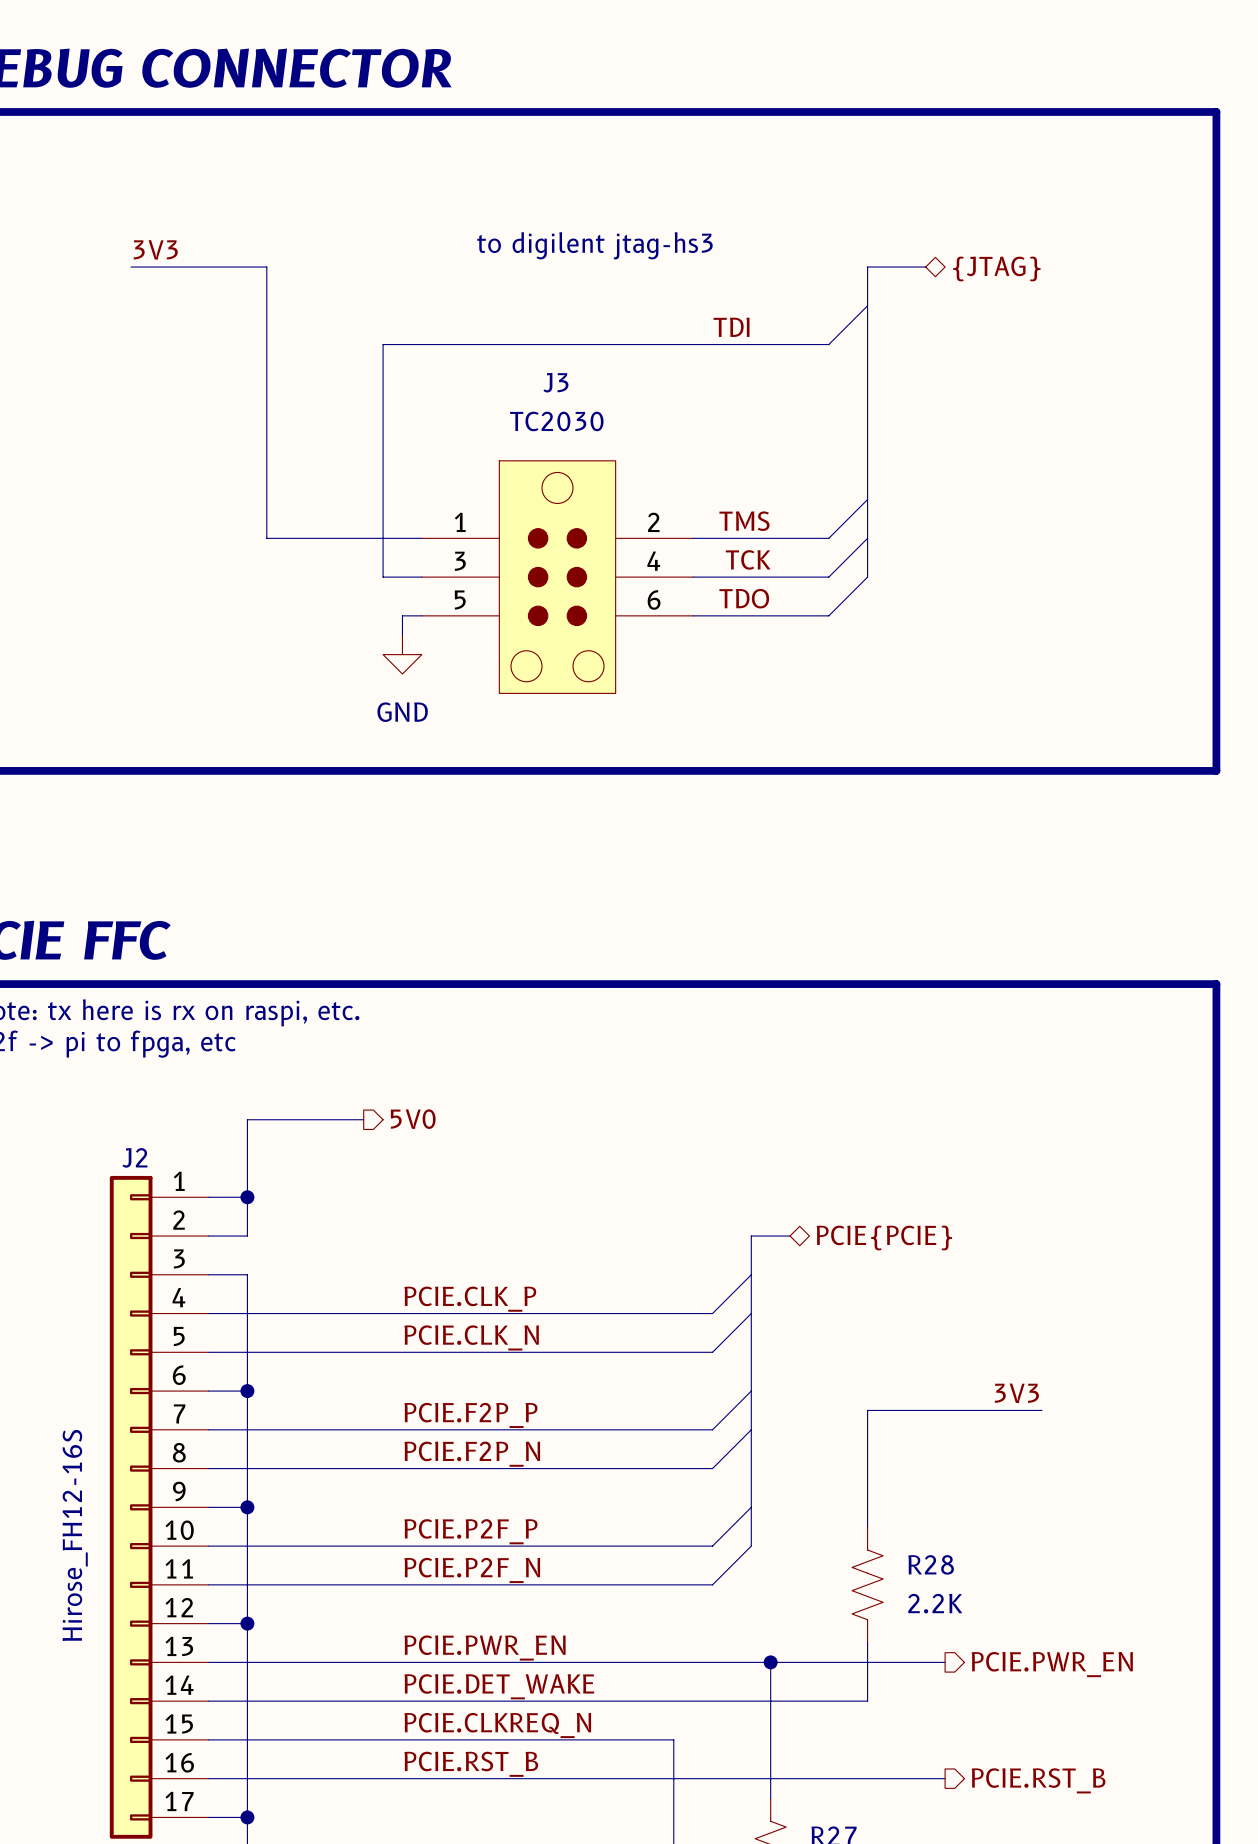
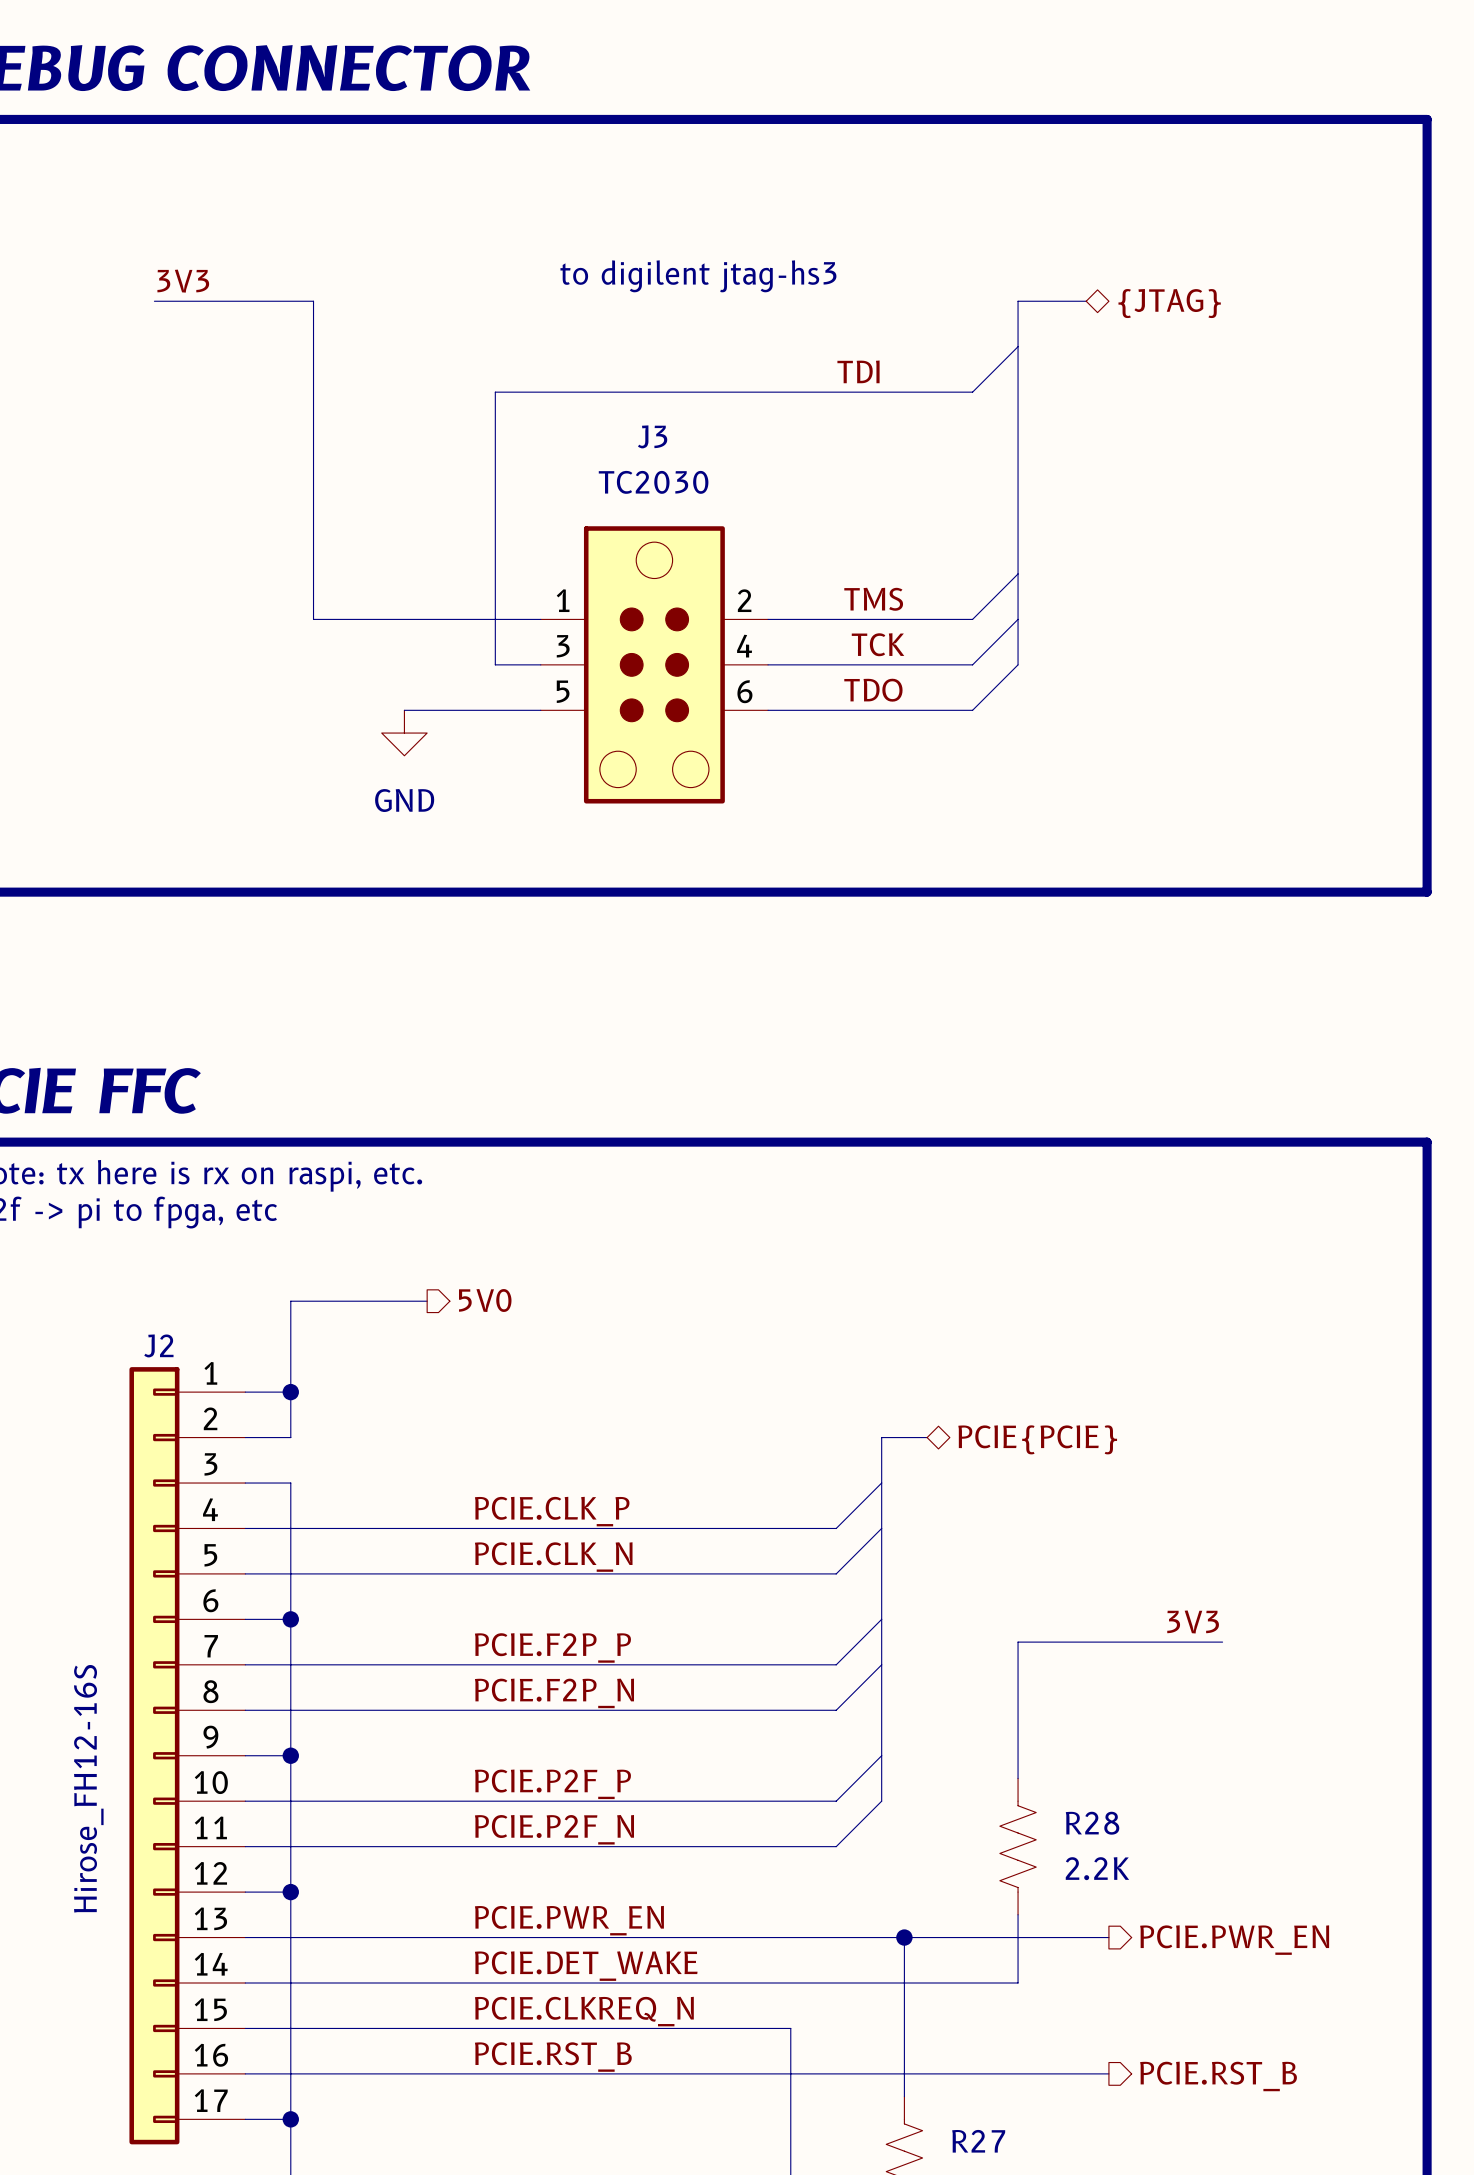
wire: (421, 344) (383, 344) (383, 577) (421, 577) -> (495, 392) (495, 664) (540, 664)
J3 symbol: [421, 460, 694, 694] -> [540, 526, 769, 804]
wire: (402, 615) (402, 635) -> (472, 710) (404, 710)
power symbol position: GND (402, 654) -> GND (404, 733)

